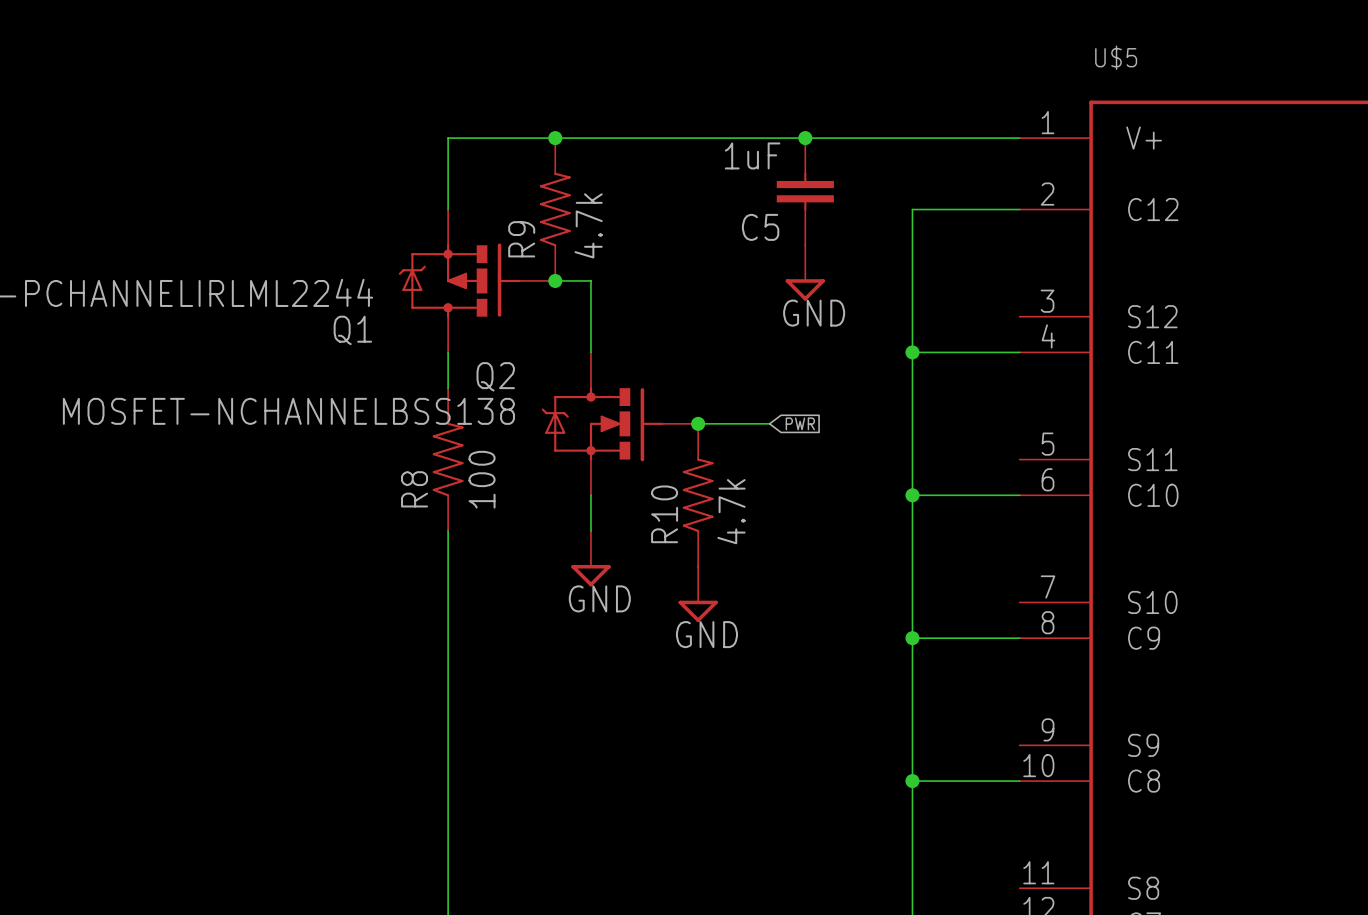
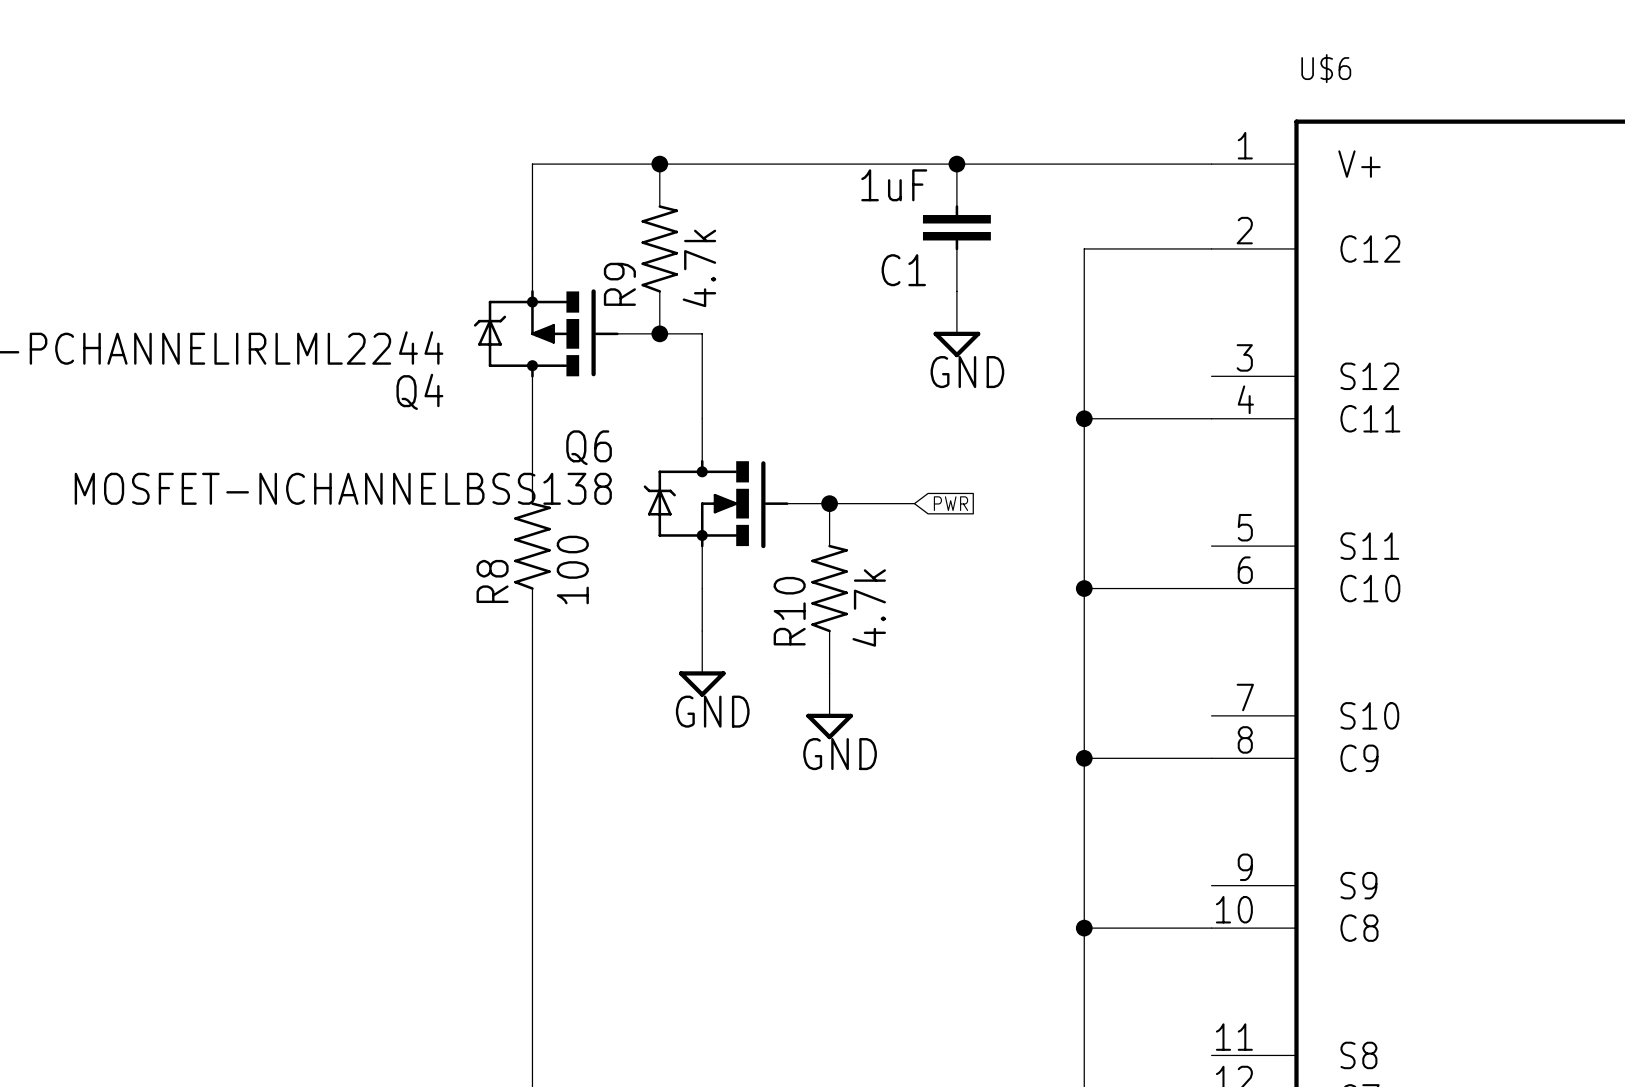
U$5 name: U$5 (1116, 57) -> U$6 (1326, 68)
C5 name: C5 (760, 227) -> C1 (903, 270)
Q1 name: Q1 (352, 330) -> Q4 (419, 391)
Q2 name: Q2 (495, 376) -> Q6 (589, 447)

